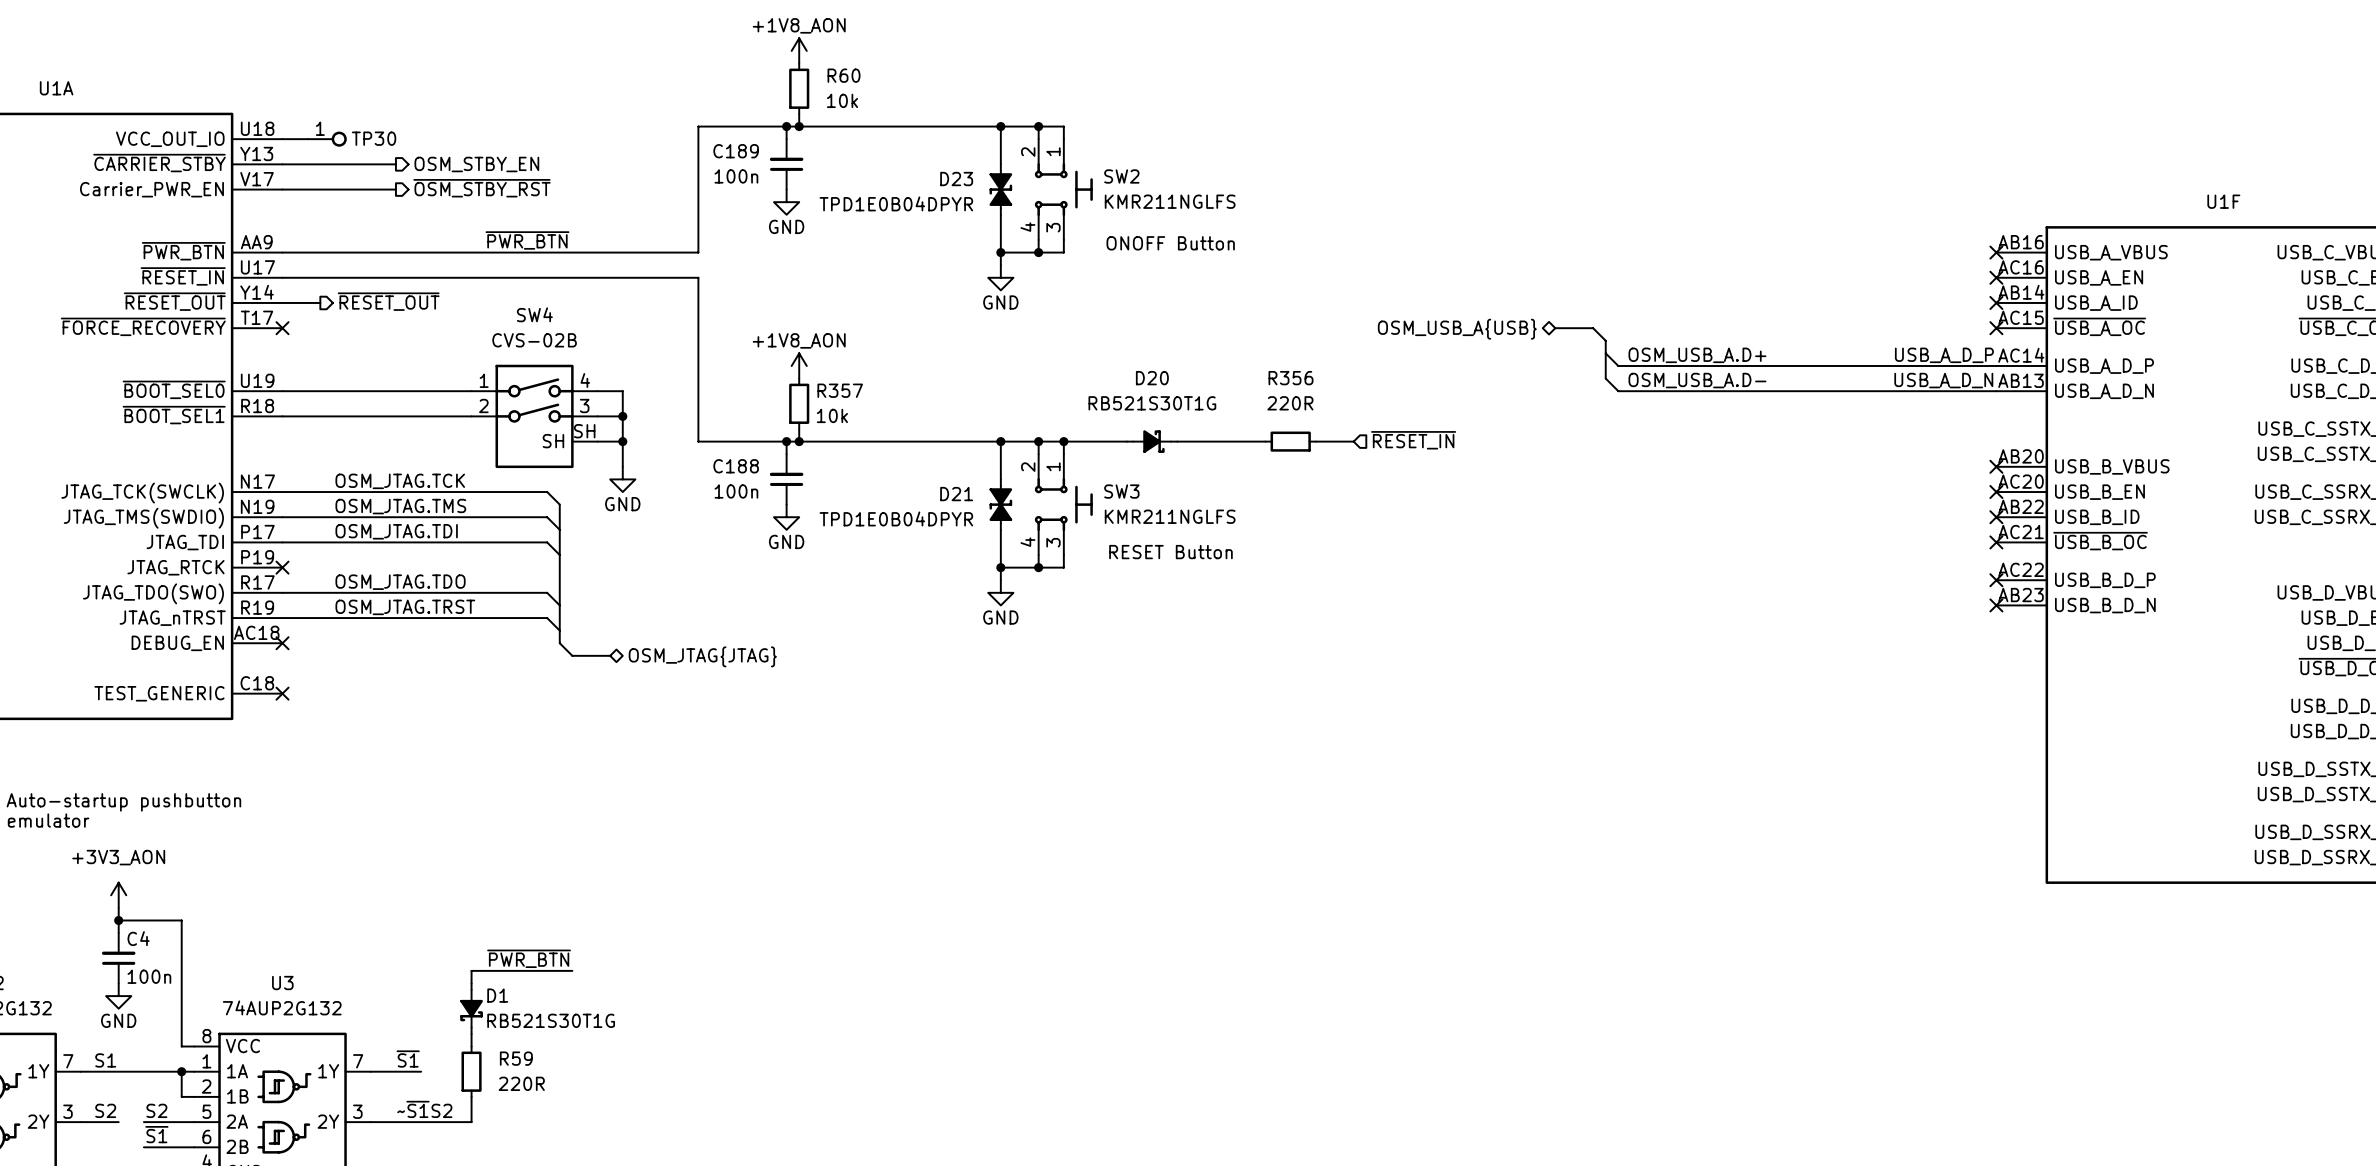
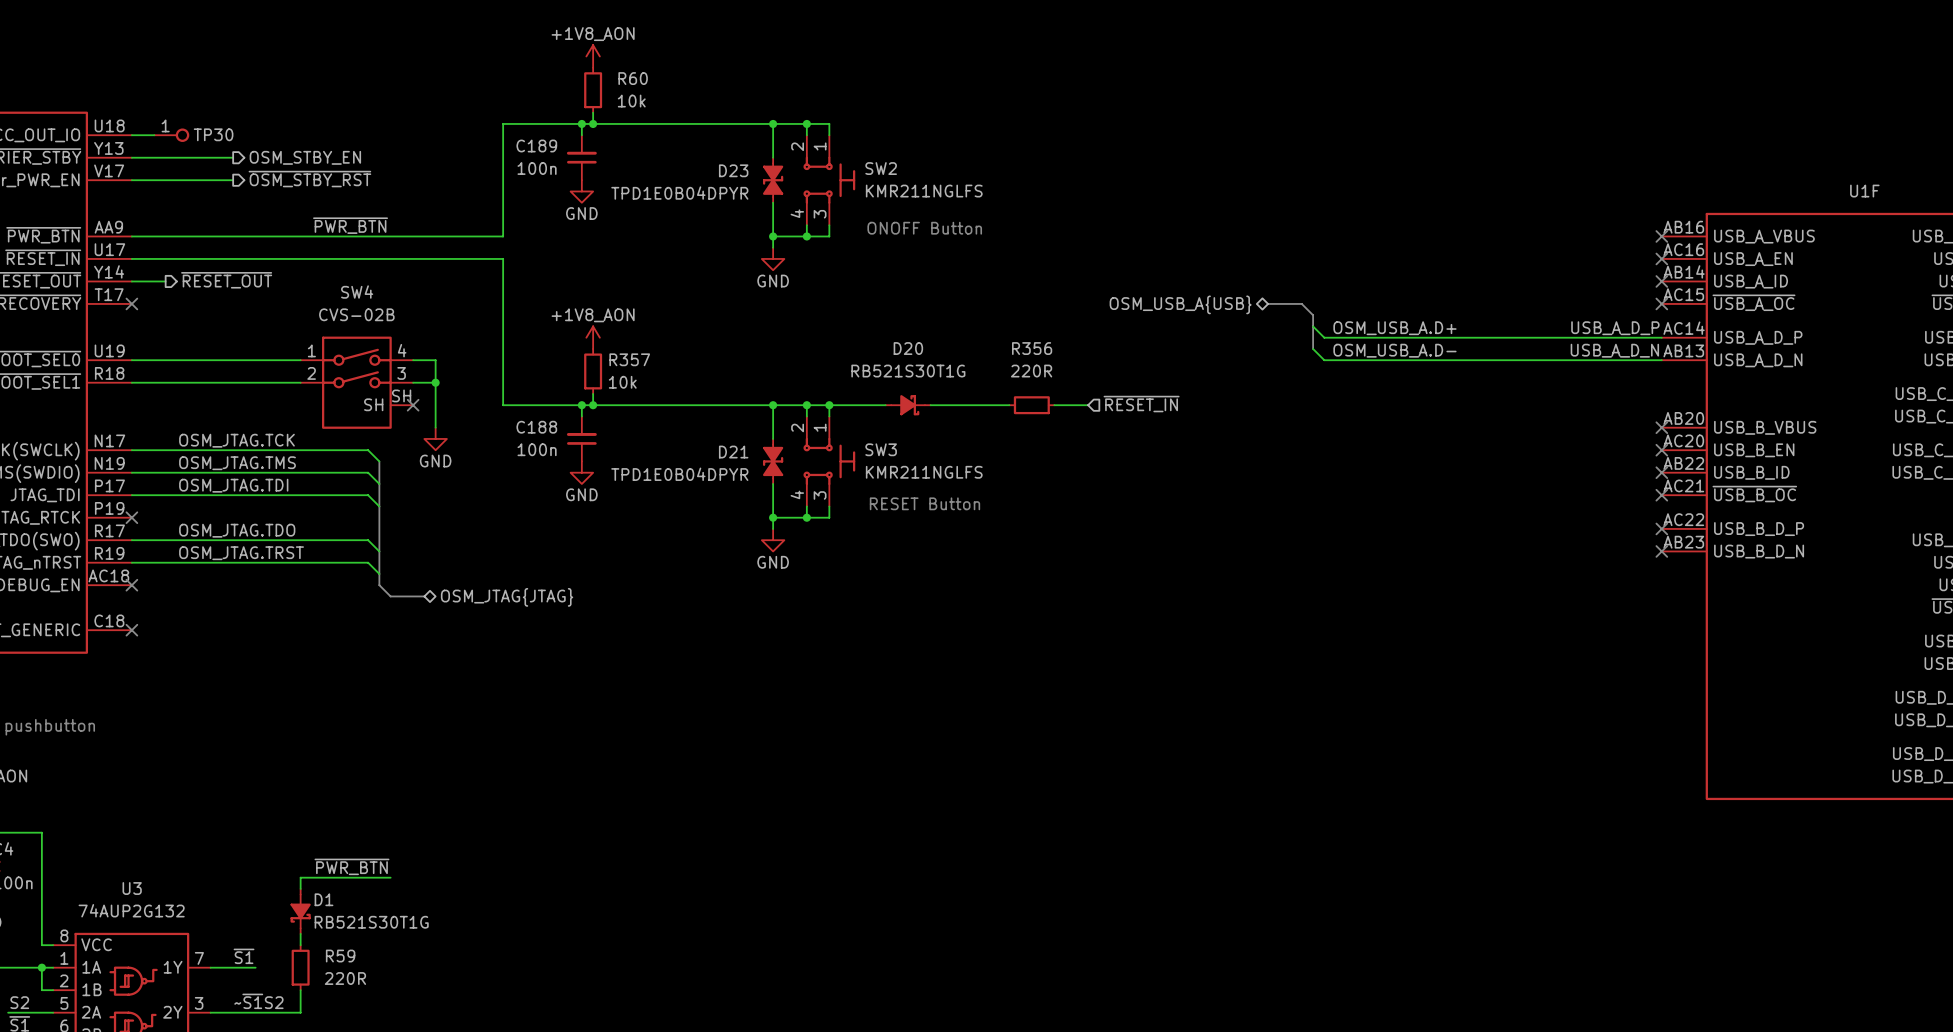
wire: (597, 441) (622, 441) -> none
no-connect mark: none -> (413, 405)
junction: (622, 441) -> none

